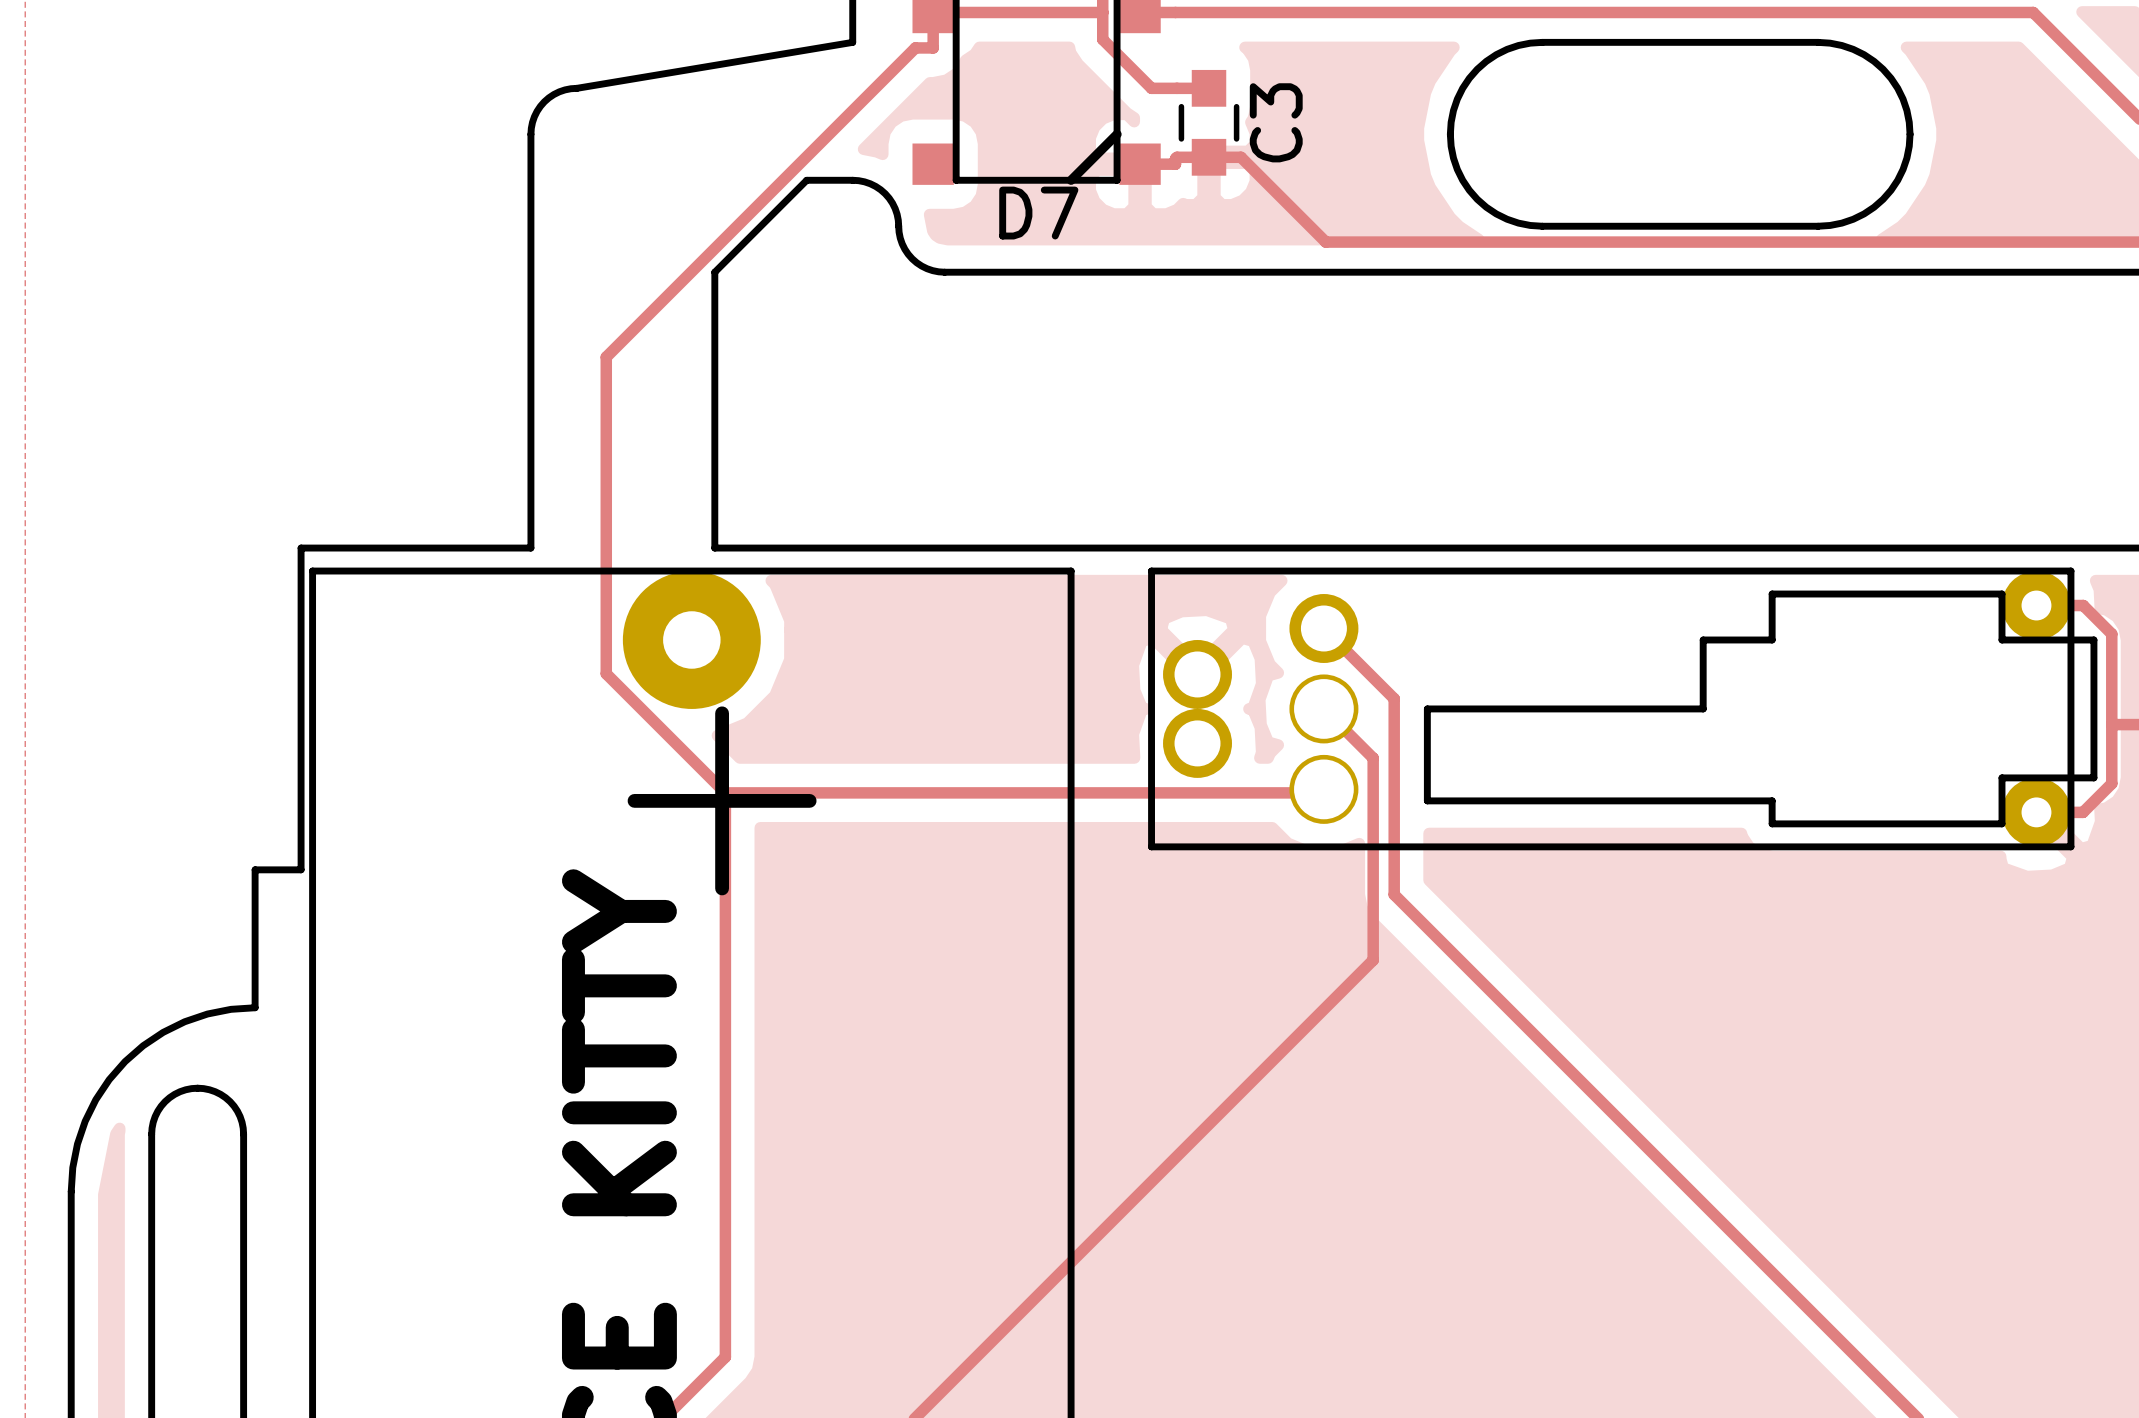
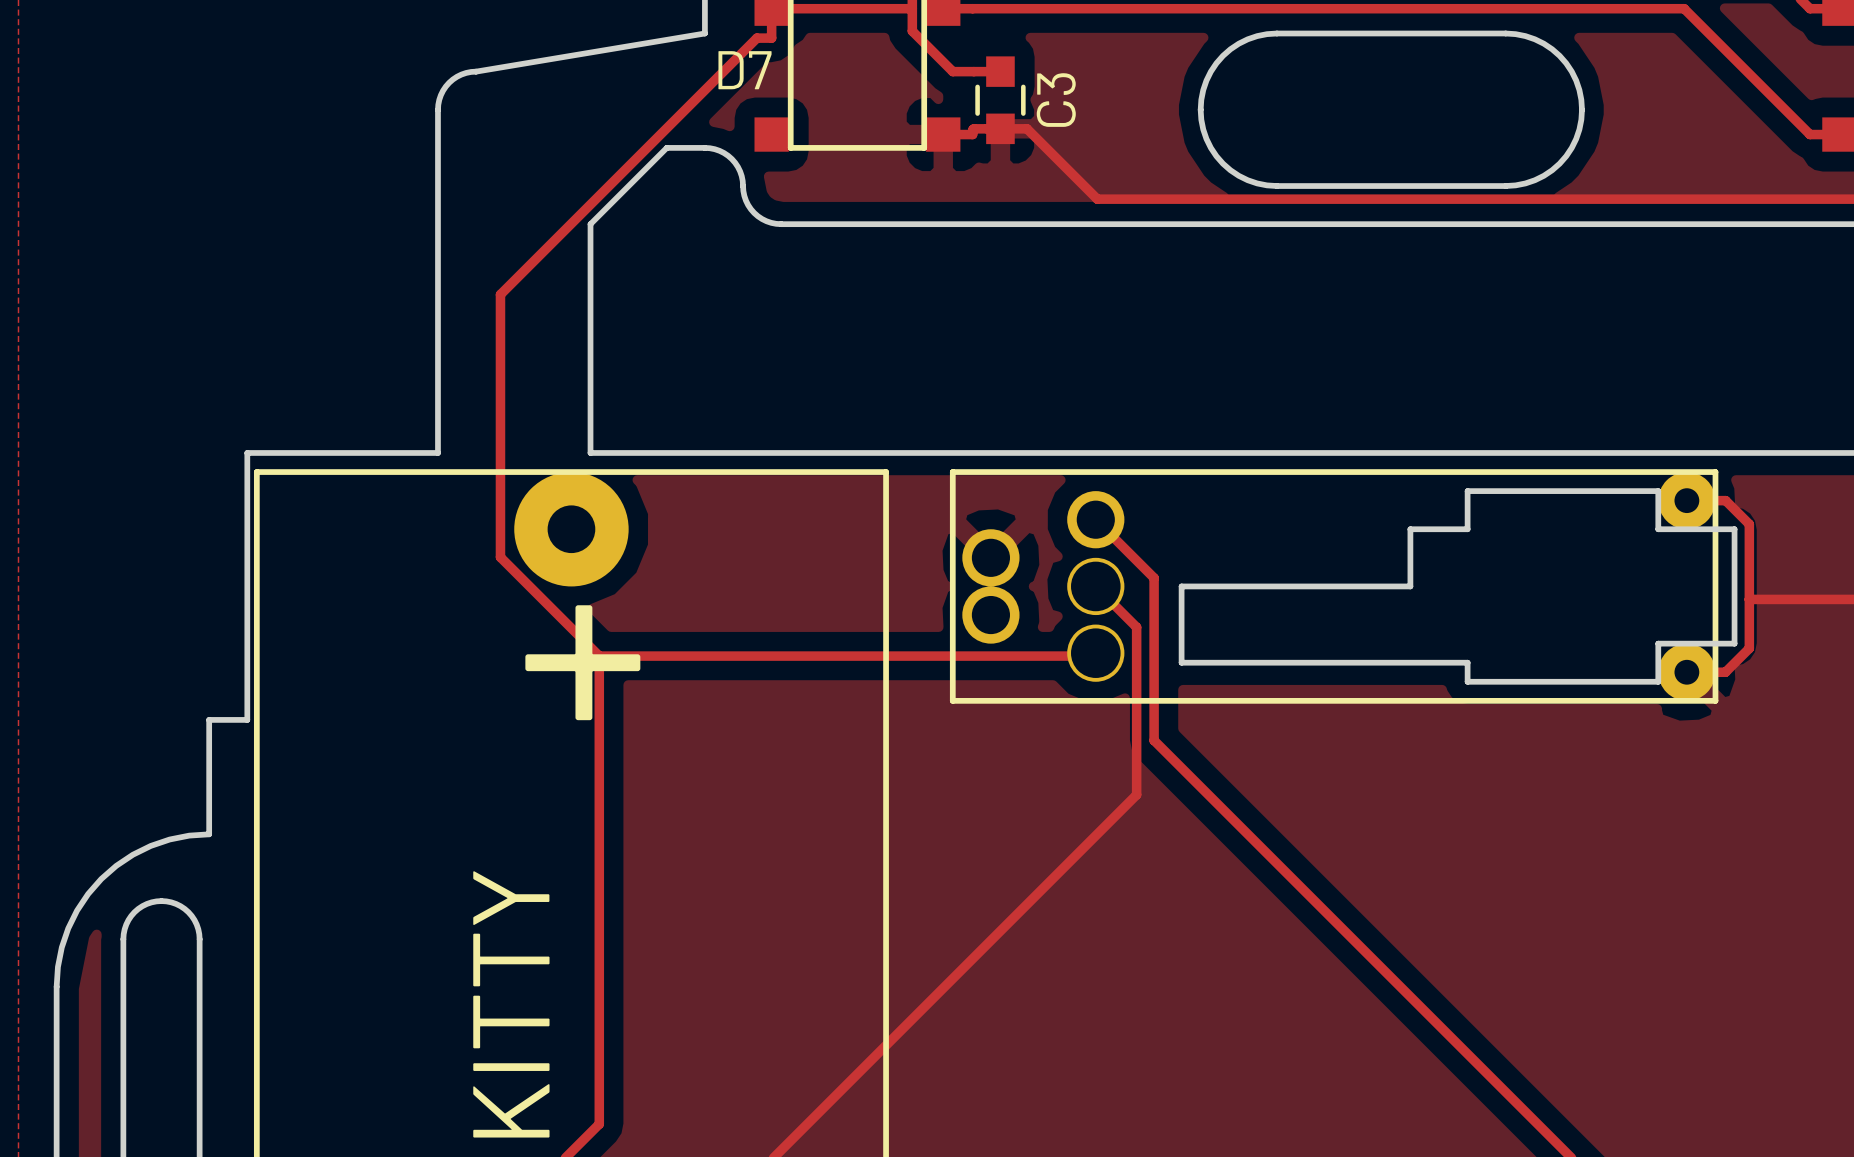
line: (1117, 134) (1071, 180) -> none
D7 name position: D7 (1038, 213) -> D7 (745, 70)

